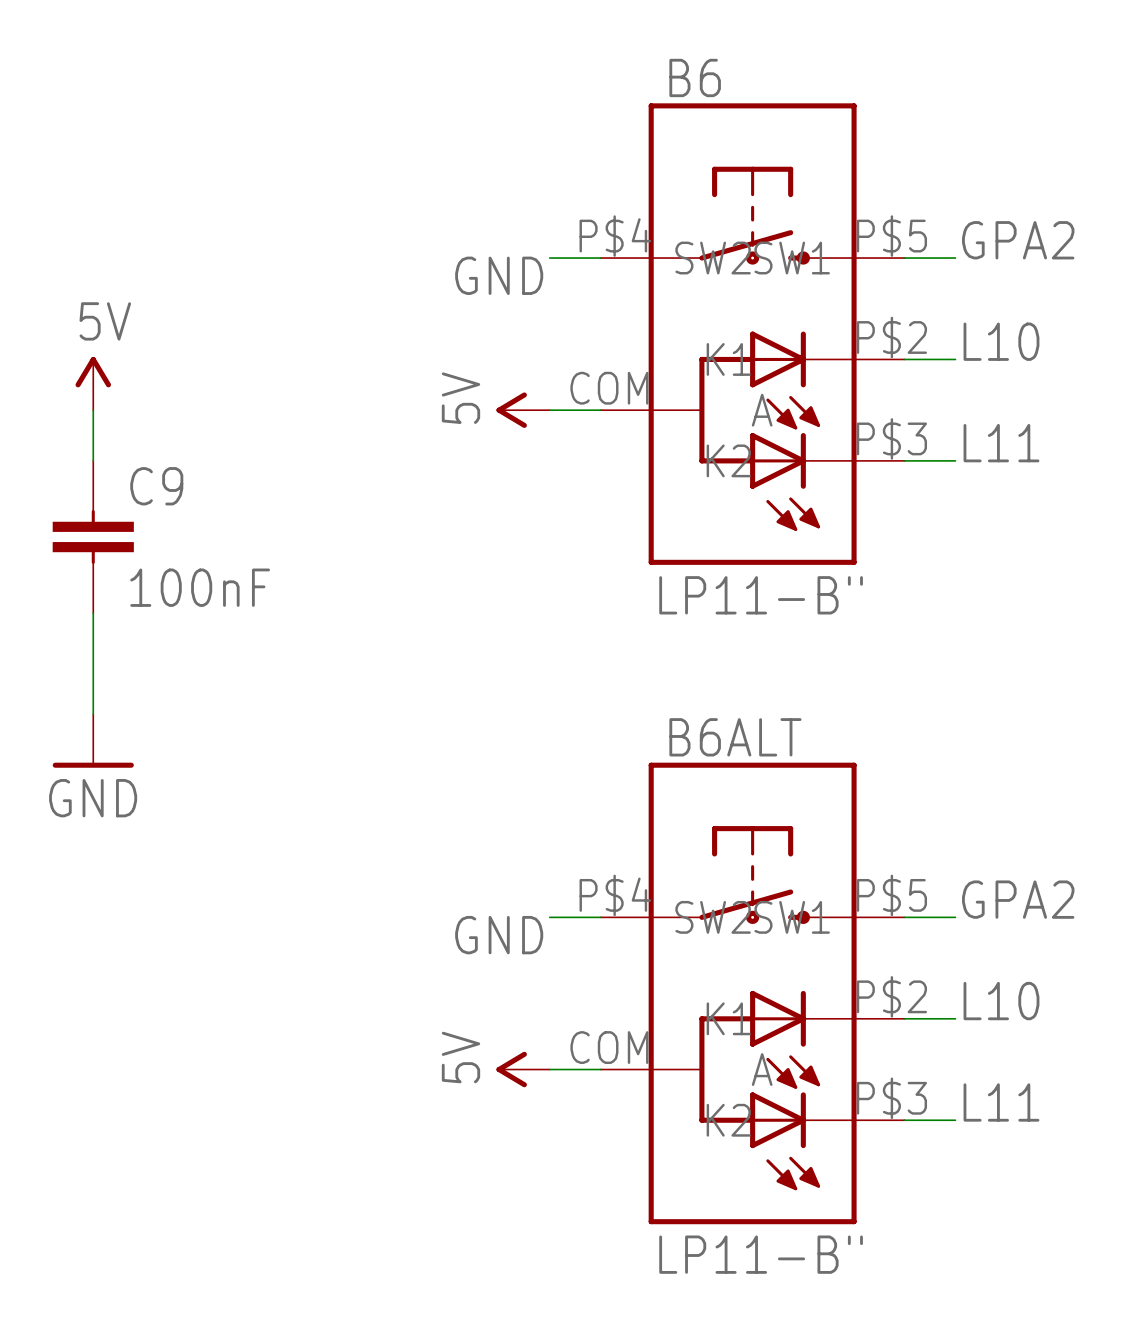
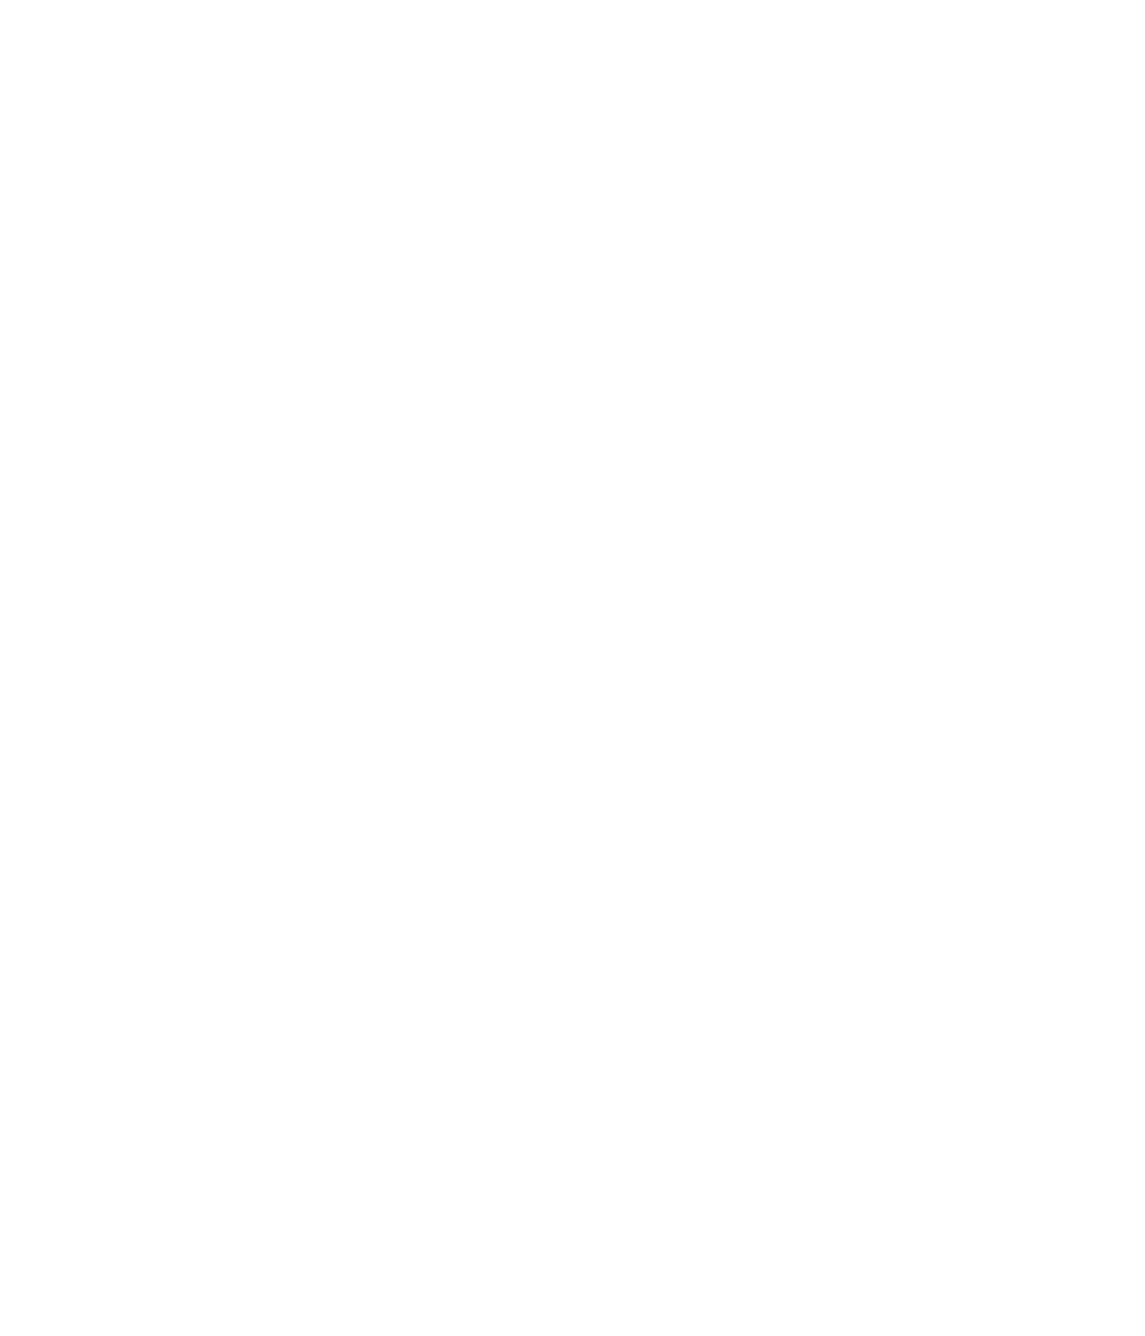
label: GPA2 (1018, 240) -> none
wire: (549, 258) (600, 258) -> none
wire: (904, 258) (955, 258) -> none
label: GND (499, 275) -> none
B6: LP11-B" (752, 334) -> none
label: L10 (1001, 341) -> none
wire: (904, 359) (955, 359) -> none
power symbol: 5V (93, 383) -> none
wire: (93, 410) (93, 460) -> none
power symbol: 5V (523, 410) -> none
wire: (549, 410) (600, 410) -> none
label: L11 (1001, 443) -> none
wire: (904, 460) (955, 460) -> none
C9: 100nF (93, 536) -> none
wire: (93, 613) (93, 714) -> none
power symbol: GND (93, 741) -> none
label: GPA2 (1018, 899) -> none
wire: (549, 917) (600, 917) -> none
wire: (904, 917) (955, 917) -> none
label: GND (499, 935) -> none
B6ALT: LP11-B" (752, 993) -> none
label: L10 (1001, 1001) -> none
wire: (904, 1018) (955, 1018) -> none
power symbol: 5V (523, 1069) -> none
wire: (549, 1069) (600, 1069) -> none
label: L11 (1001, 1102) -> none
wire: (904, 1120) (955, 1120) -> none

